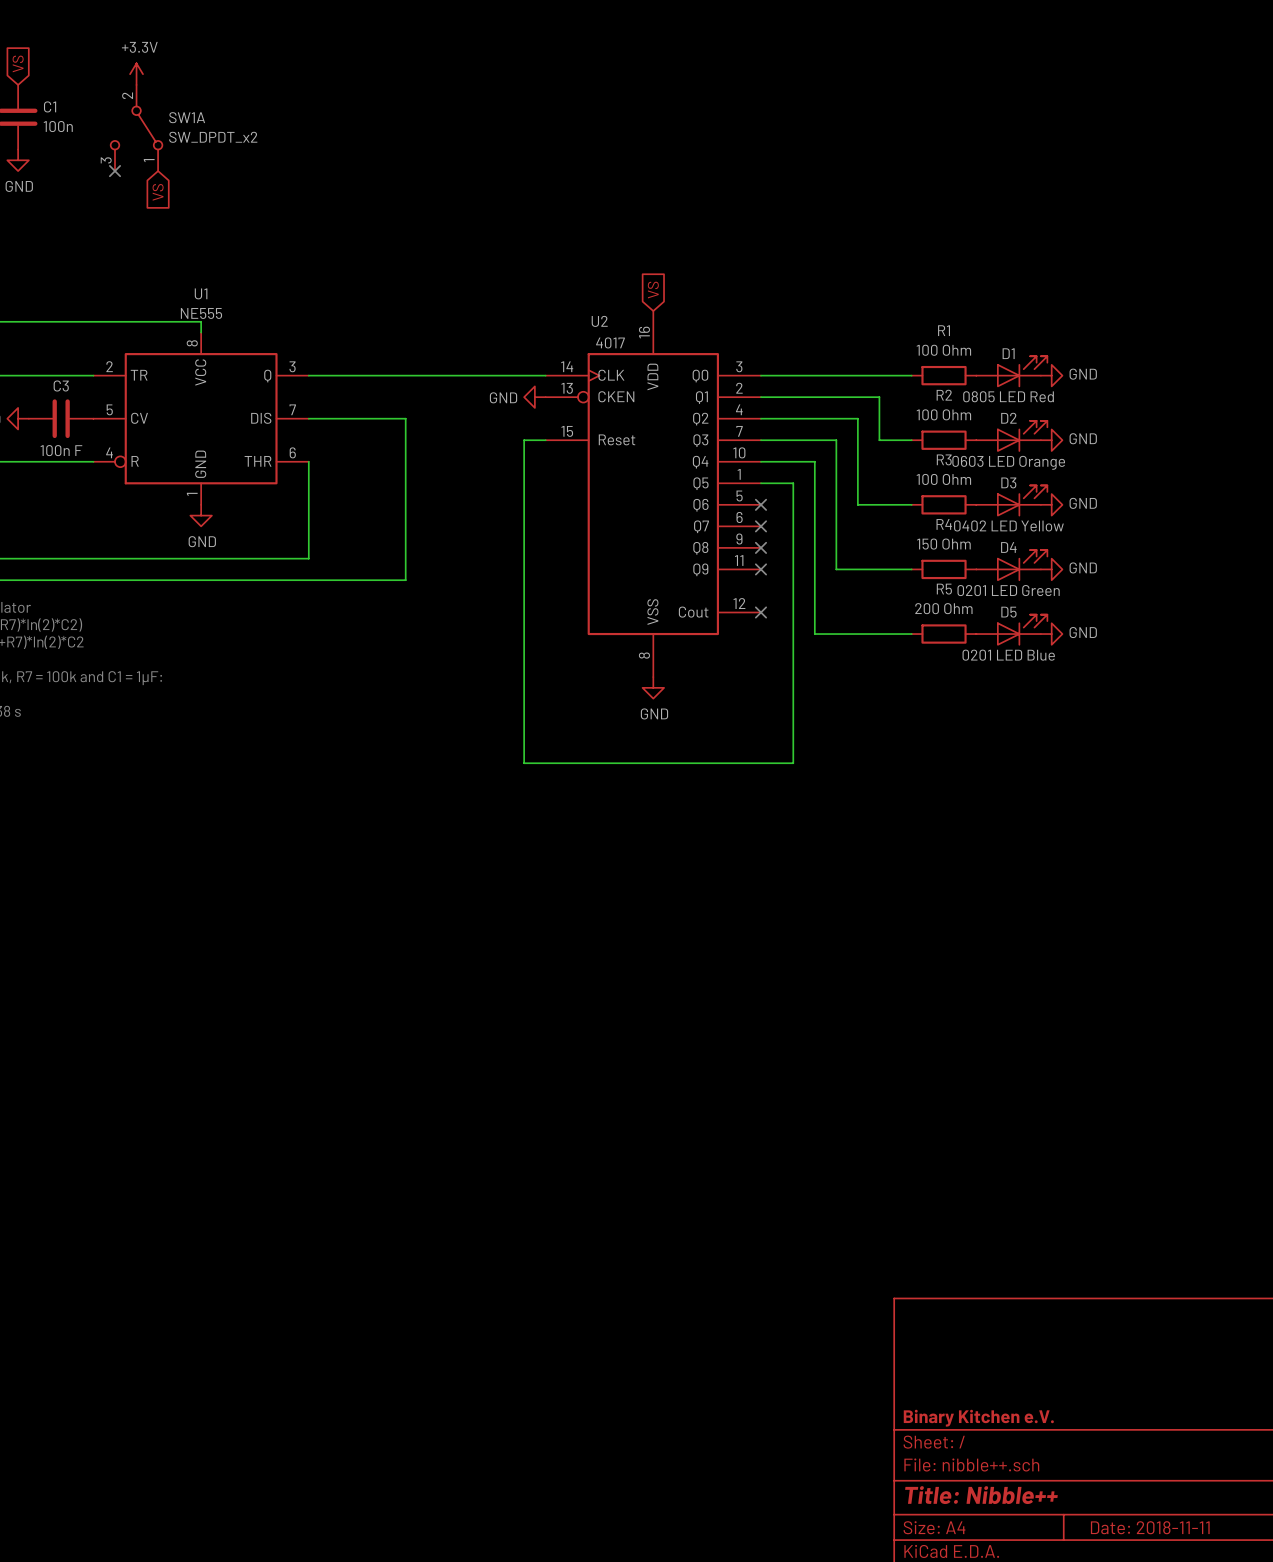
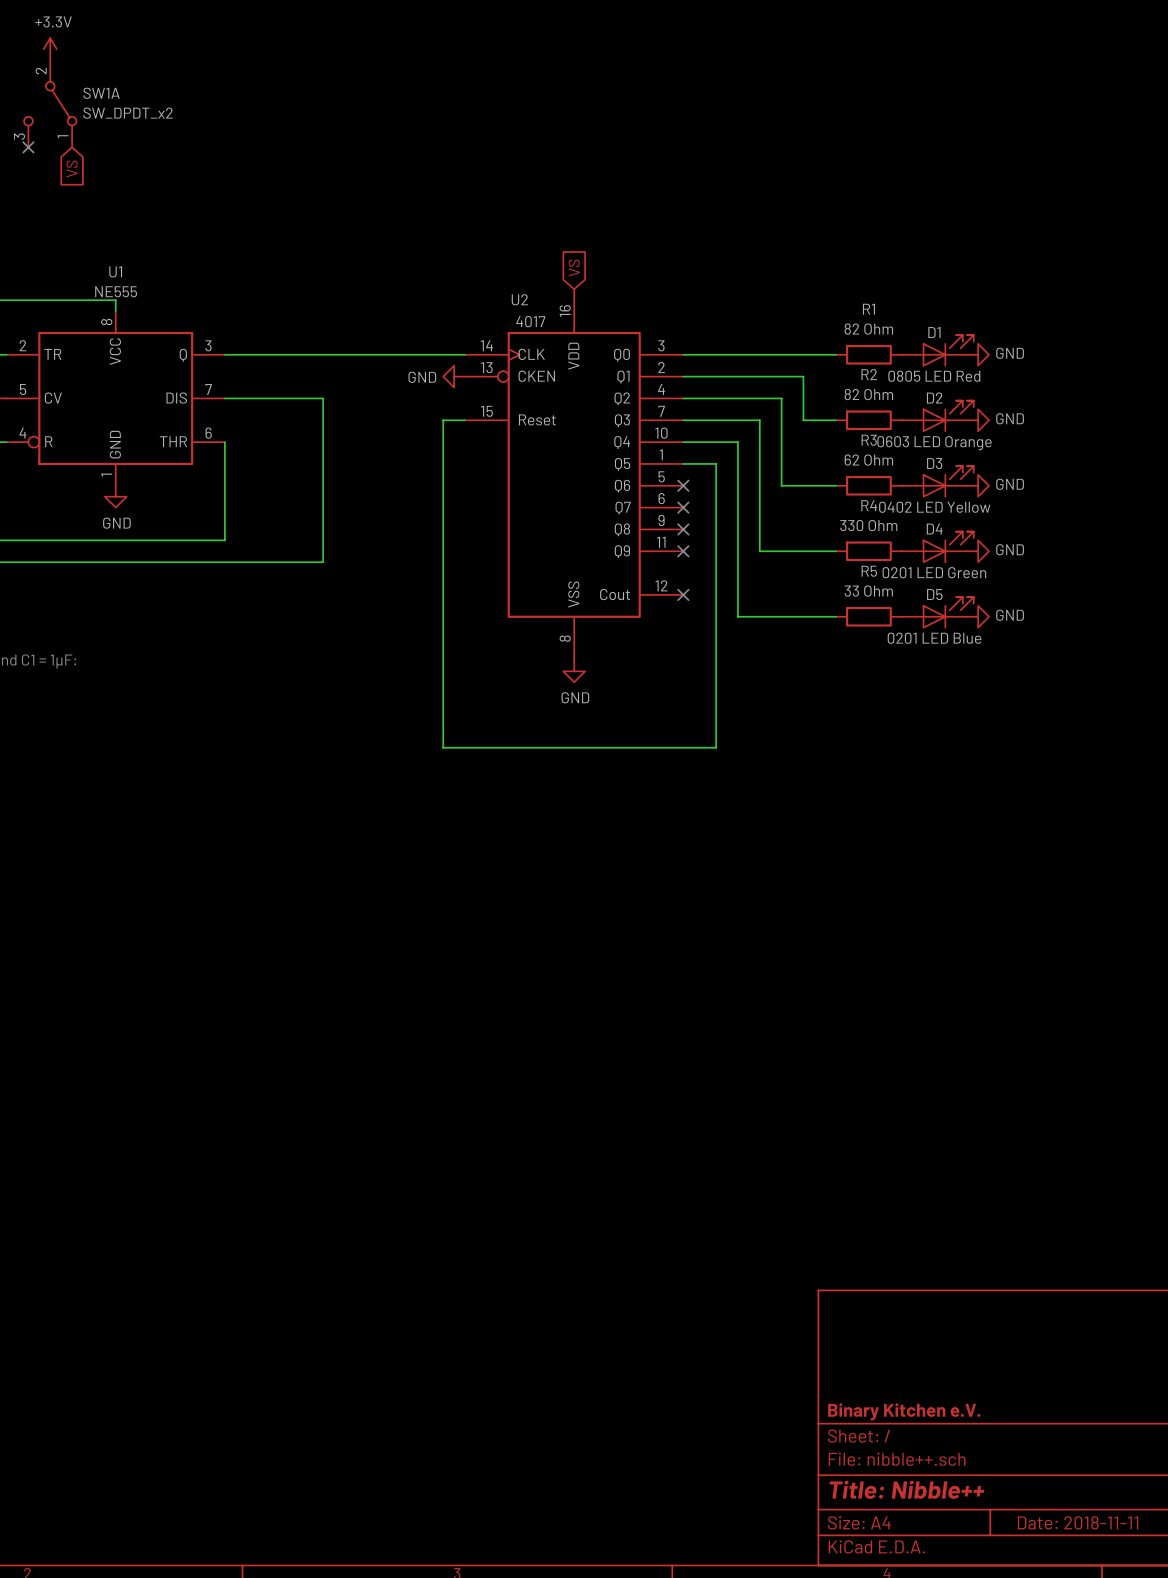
R1 value: 100 Ohm (943, 350) -> 82 Ohm (868, 329)
R2 value: 100 Ohm (943, 414) -> 82 Ohm (868, 394)
R3 value: 100 Ohm (943, 479) -> 62 Ohm (868, 460)
R4 value: 150 Ohm (943, 544) -> 330 Ohm (868, 525)
R5 value: 200 Ohm (943, 608) -> 33 Ohm (868, 591)

